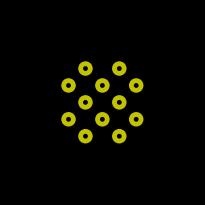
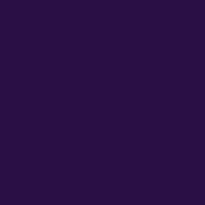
part: (102, 102) -> none

